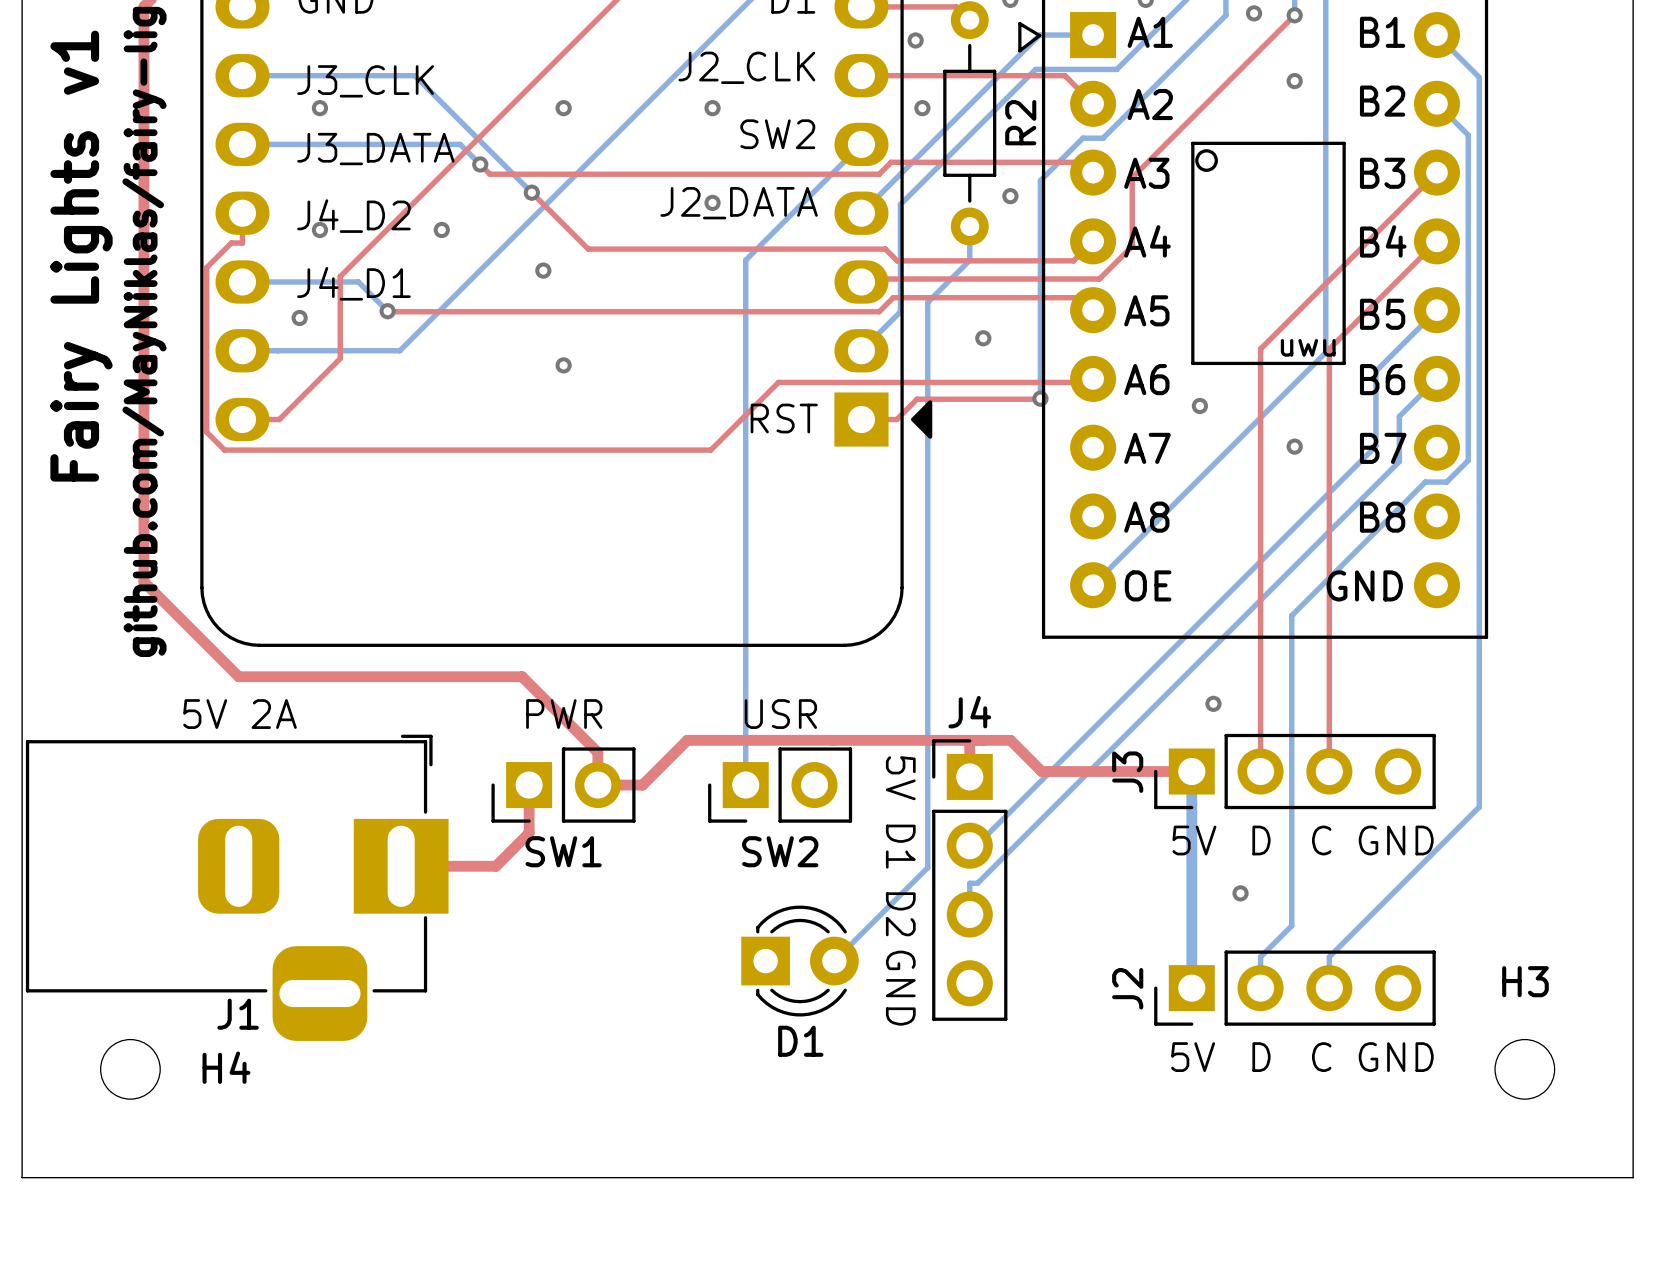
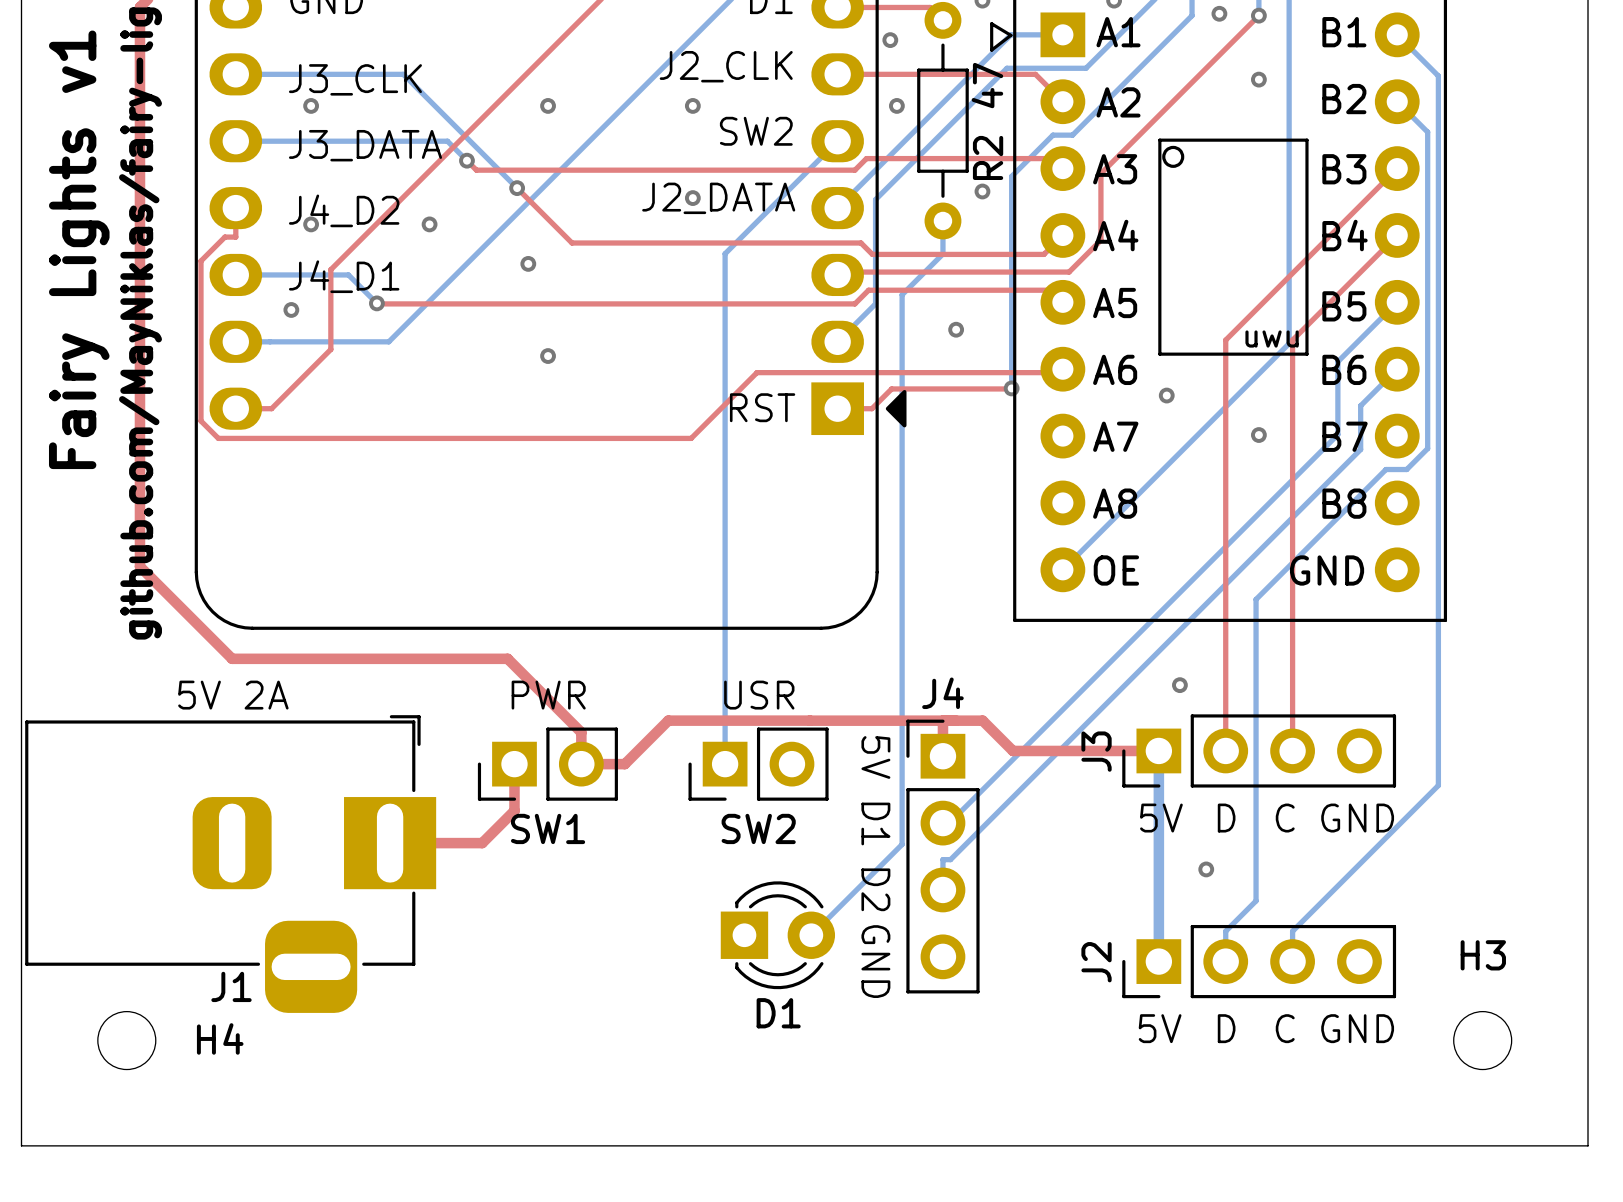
R2 value: none -> 47 (987, 85)
R2 name position: R2 (1020, 122) -> R2 (988, 157)

